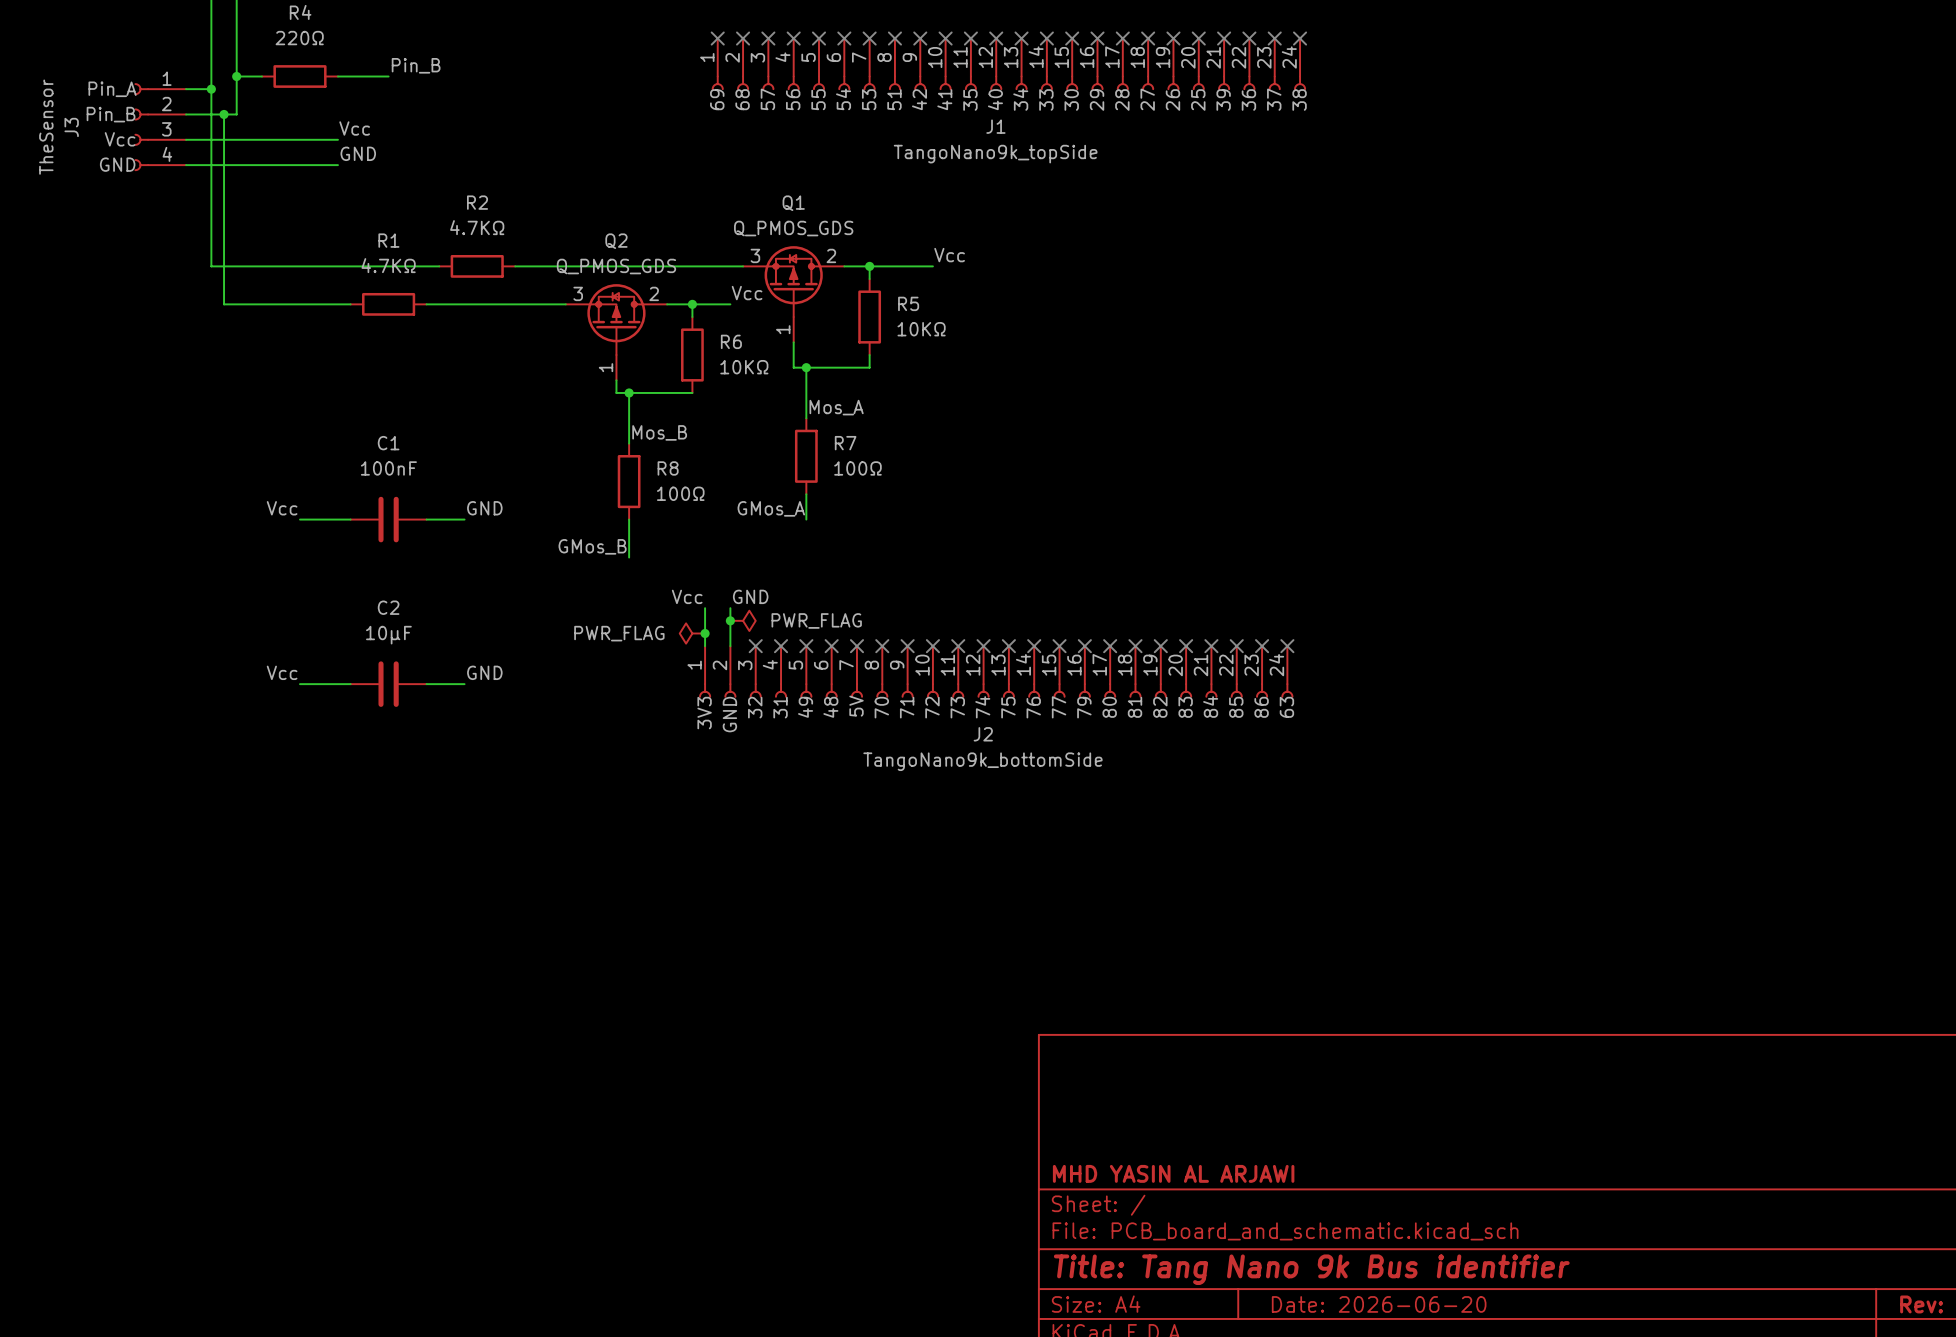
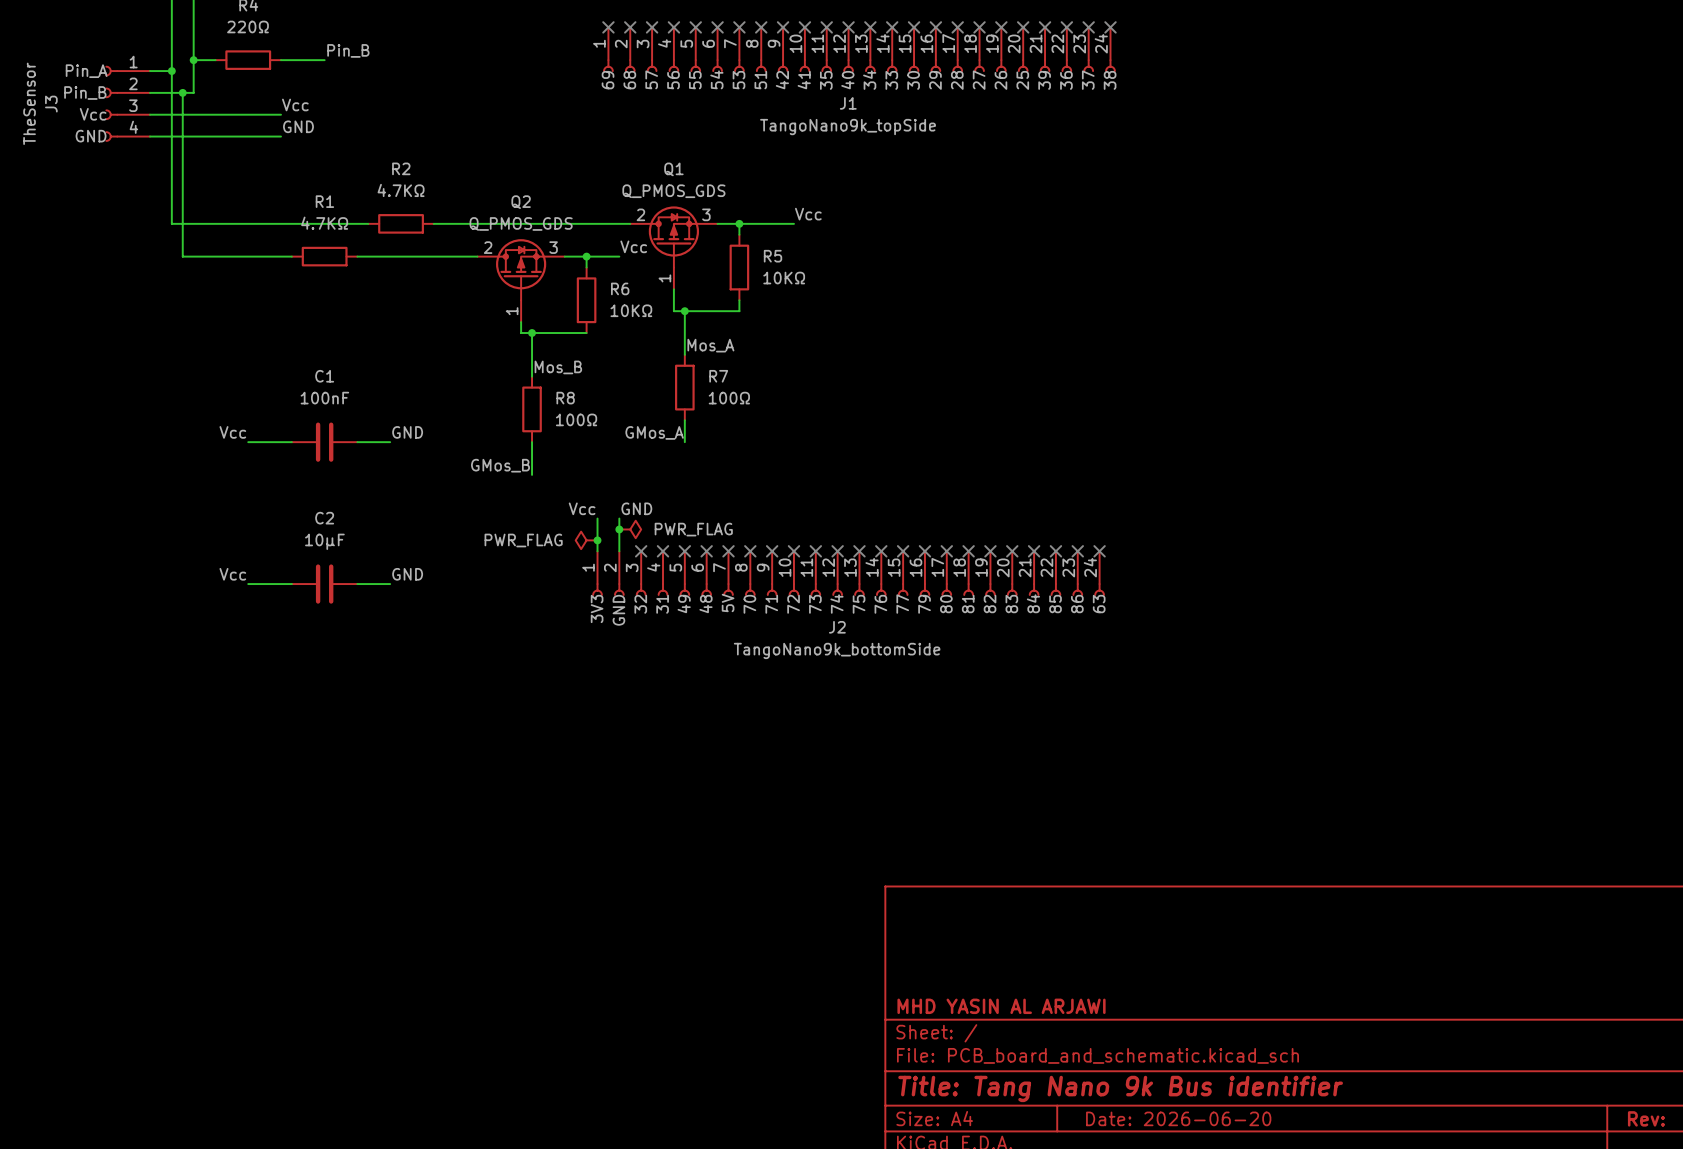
Q1 flip: as is (793, 281) -> left-right (673, 236)
Q2 flip: as is (616, 319) -> left-right (521, 269)

